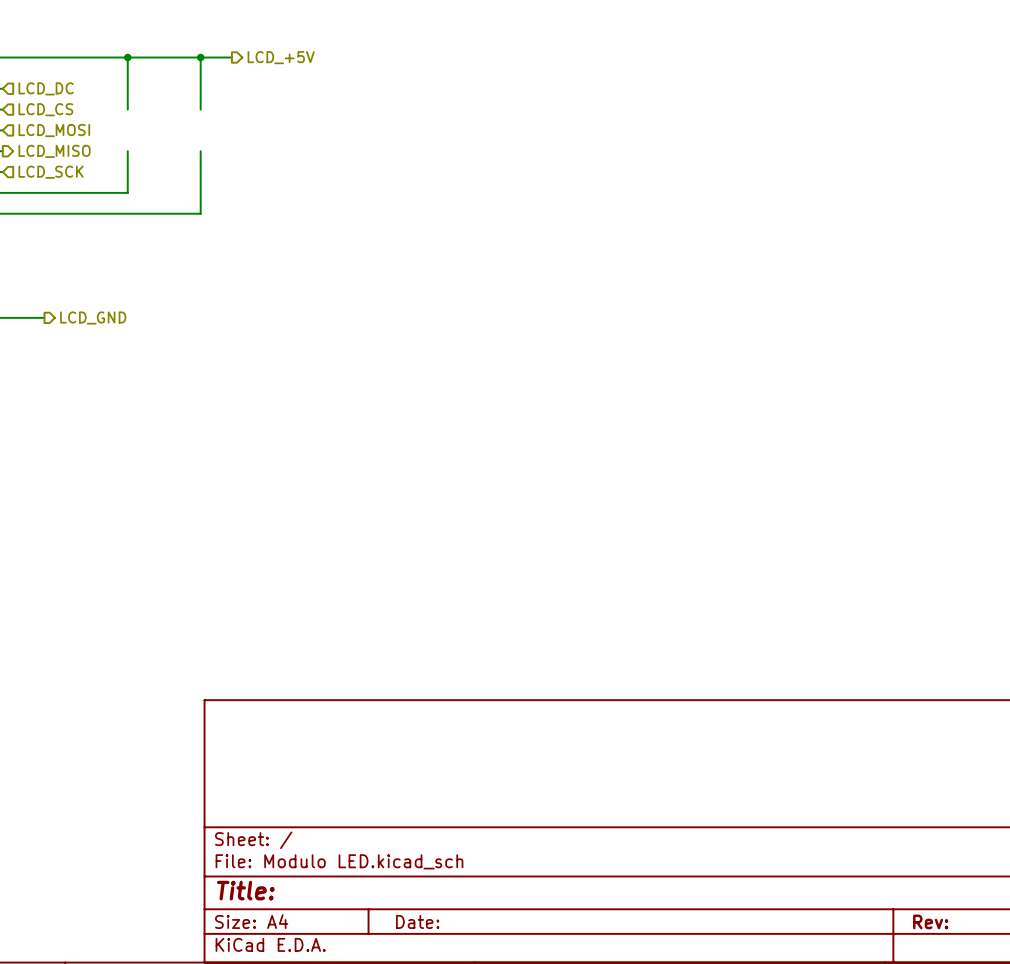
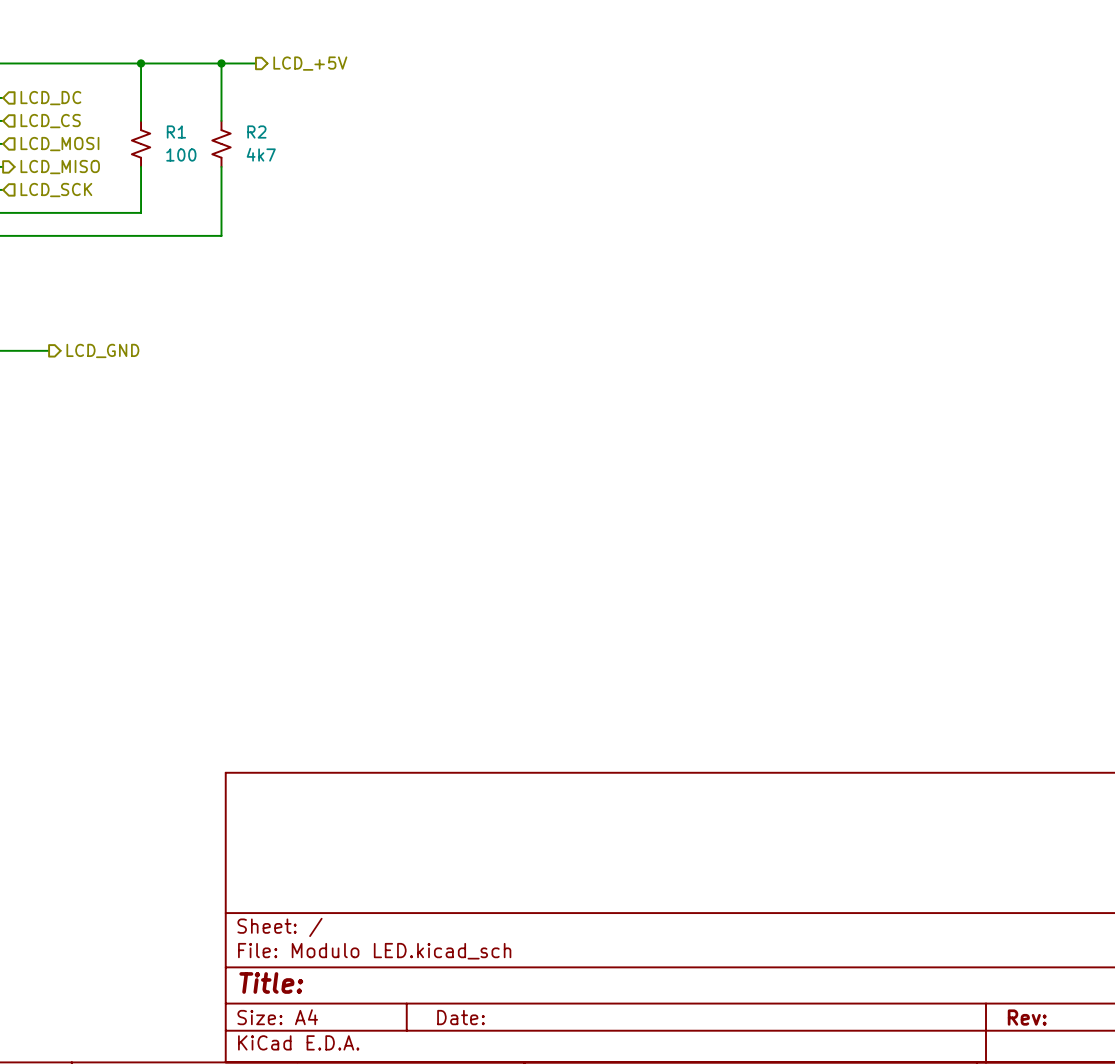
R1: none -> 100 (141, 143)
R2: none -> 4k7 (221, 143)

